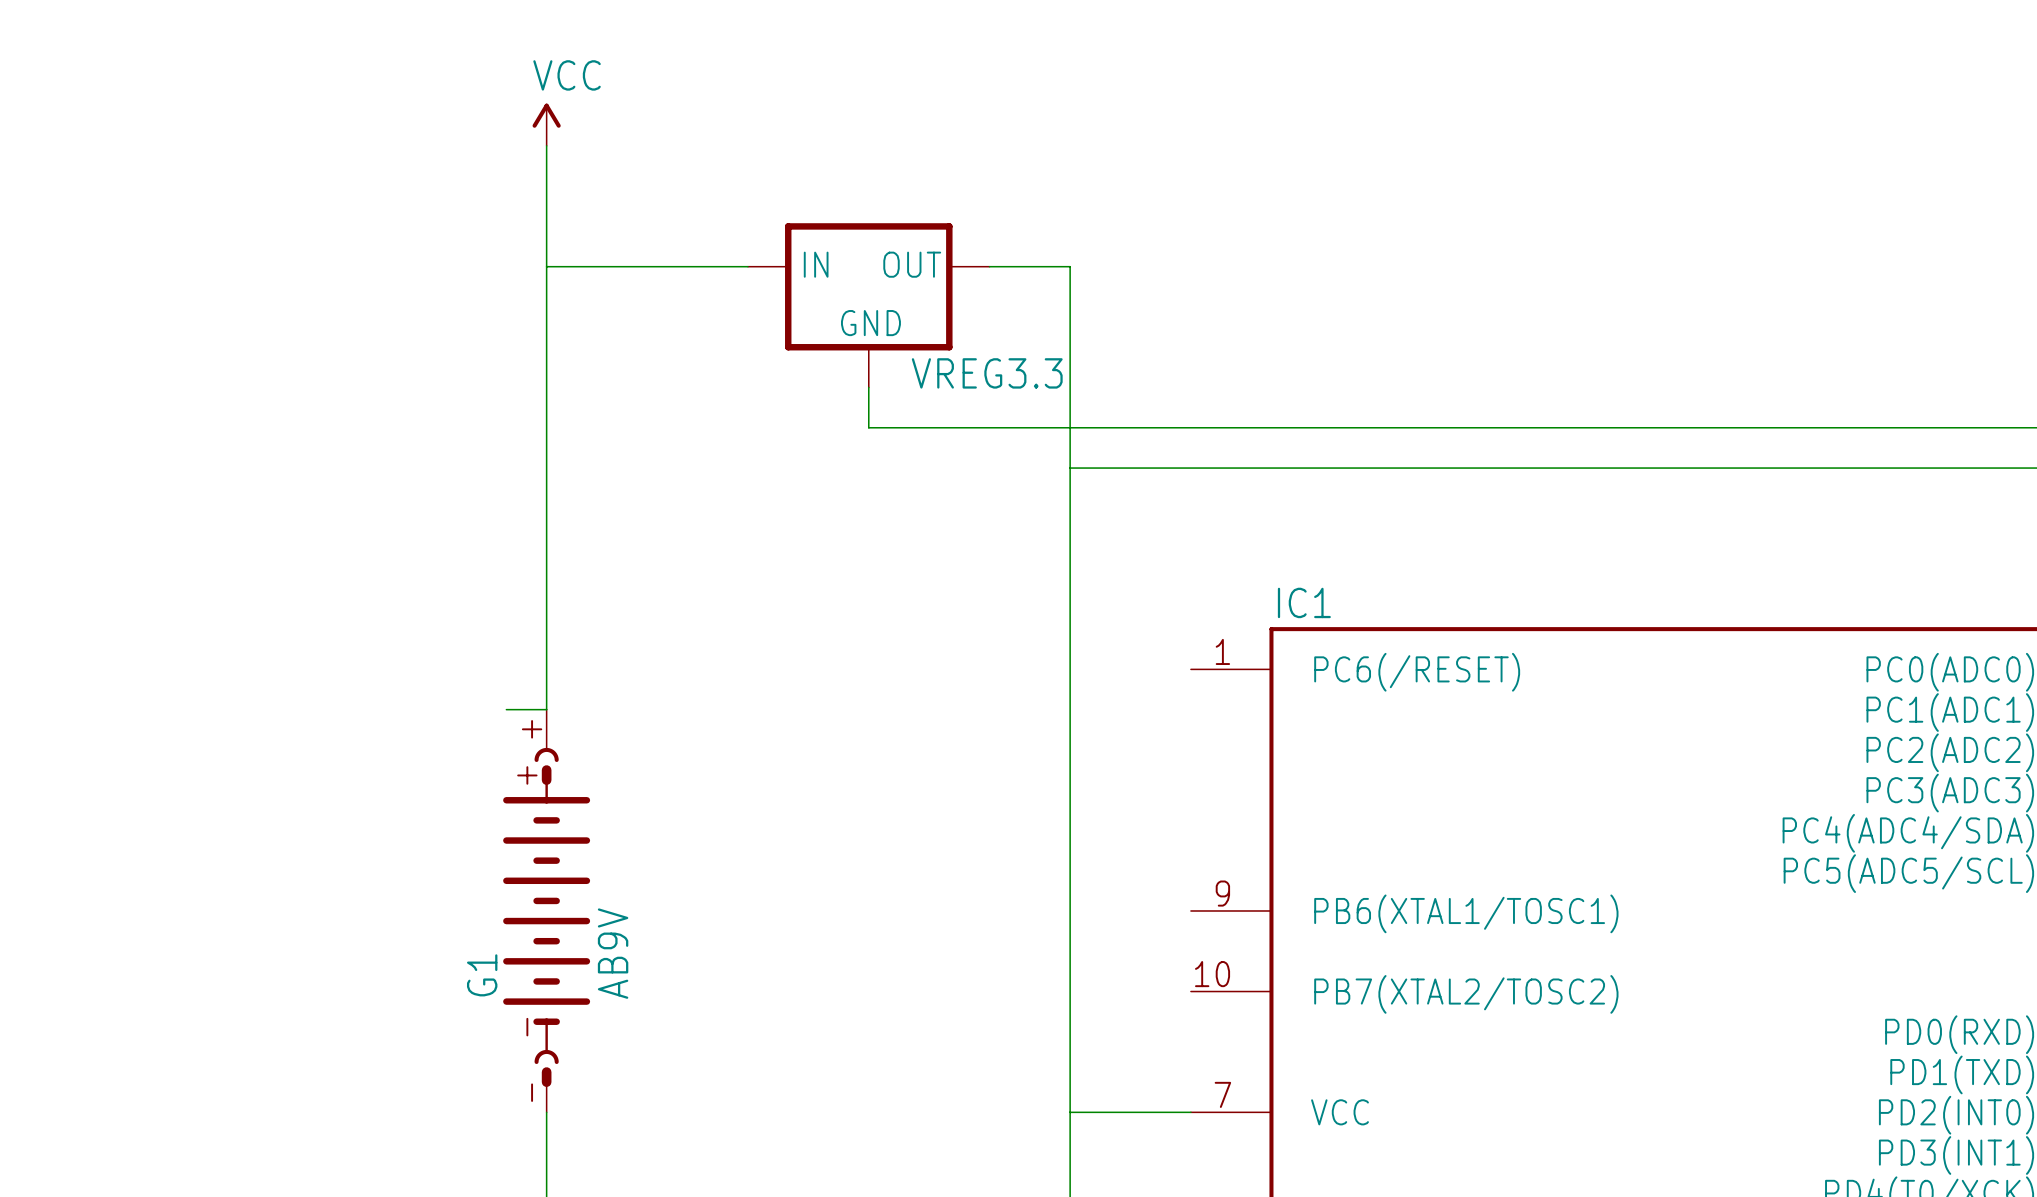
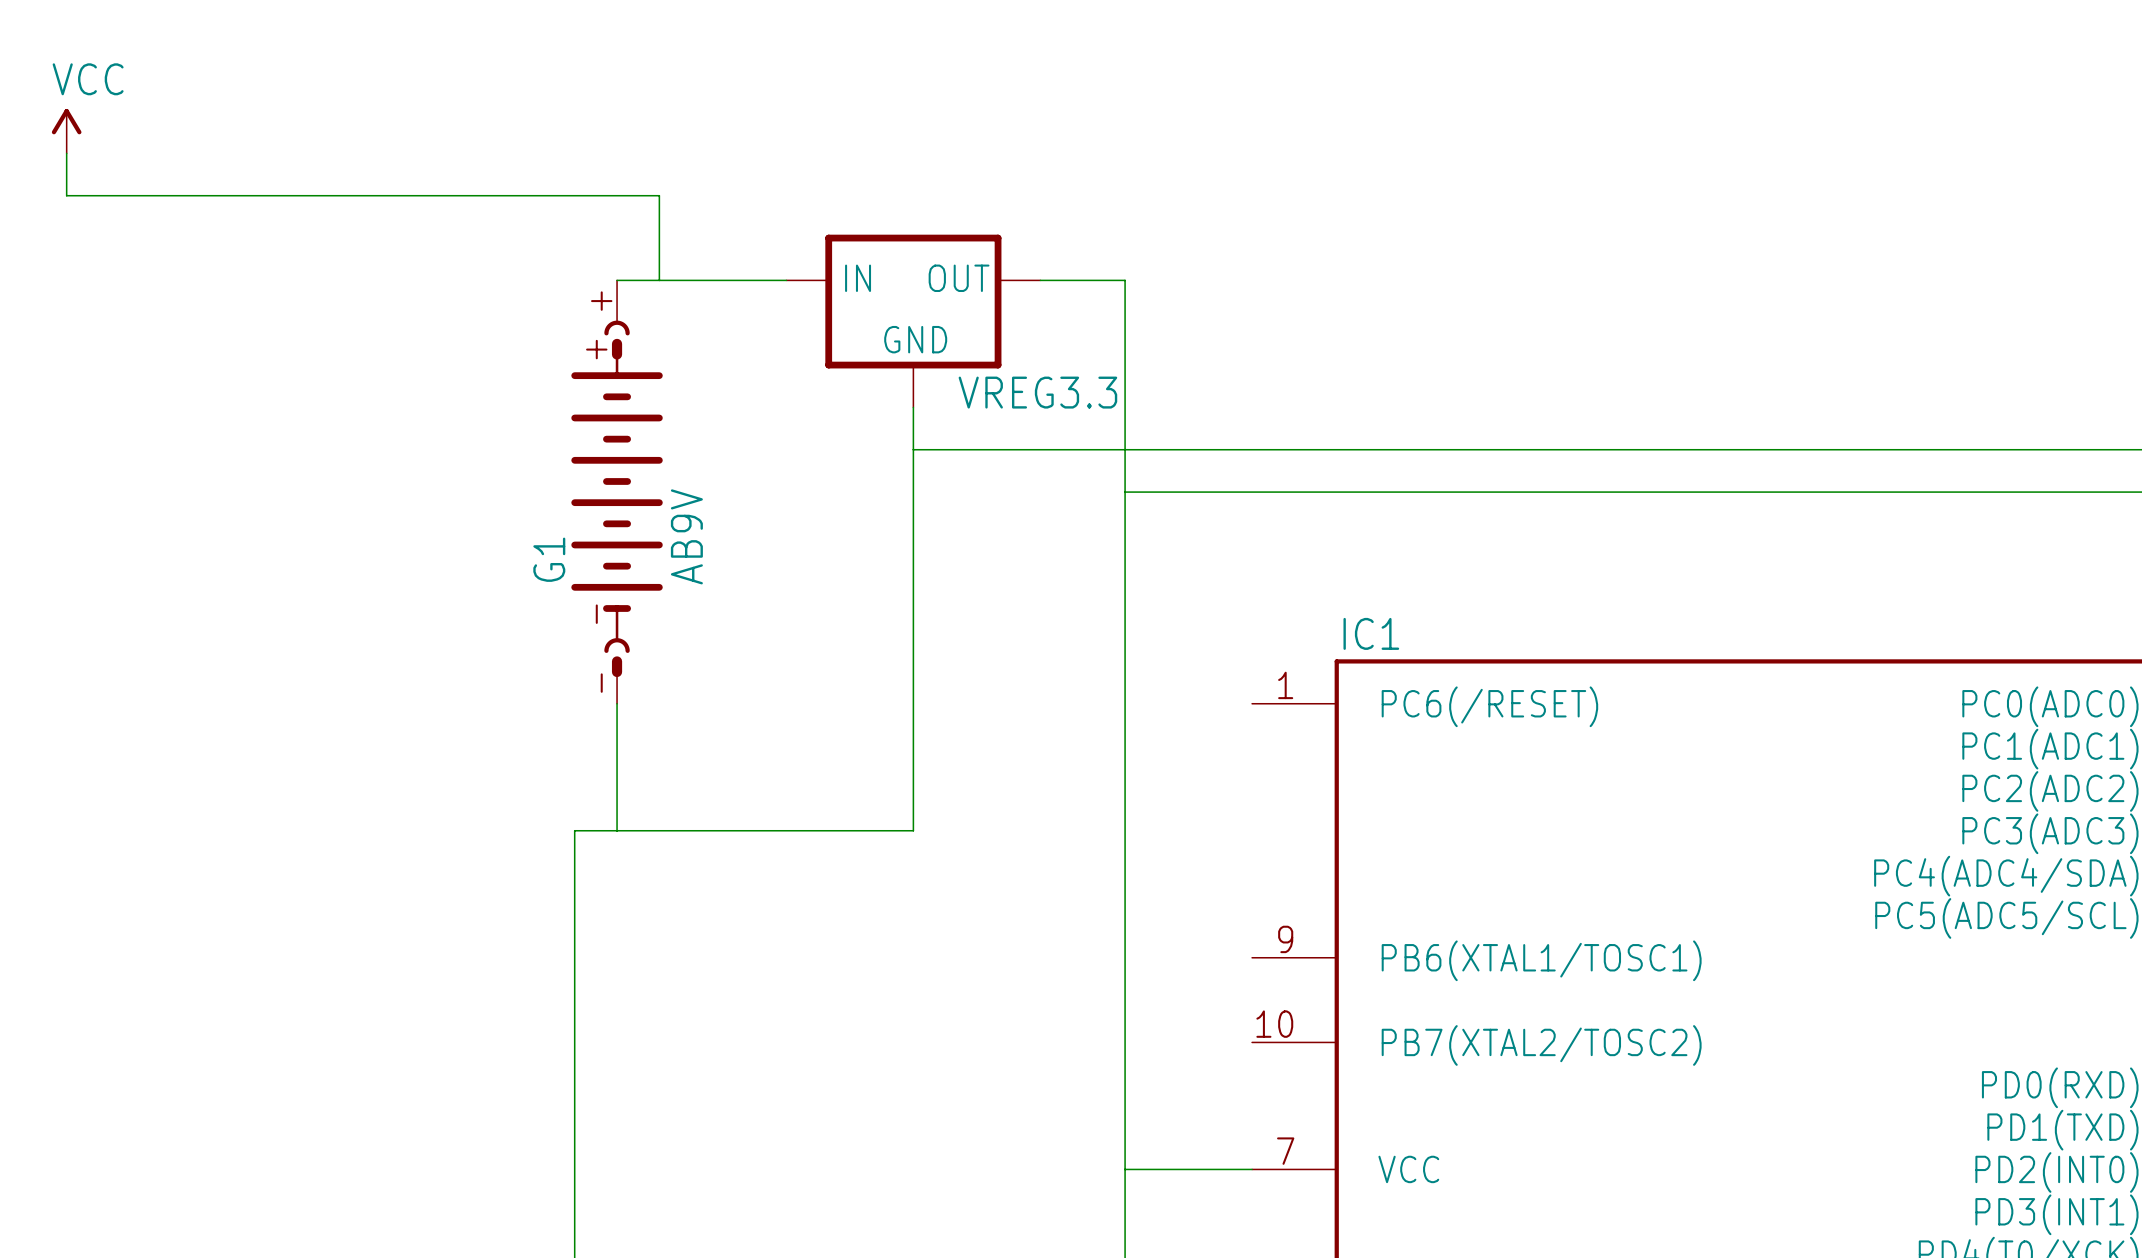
power symbol: none -> VCC (66, 131)
power symbol: VCC (546, 124) -> none
wire: none -> (66, 153) (66, 195) (659, 195) (659, 280)
wire: (546, 145) (546, 709) (506, 709) -> none
wire: (546, 266) (586, 266) -> none
wire: none -> (913, 449) (913, 830) (574, 830) (574, 1169)
wire: none -> (617, 703) (617, 830)
G1 position: (546, 910) -> (617, 492)

